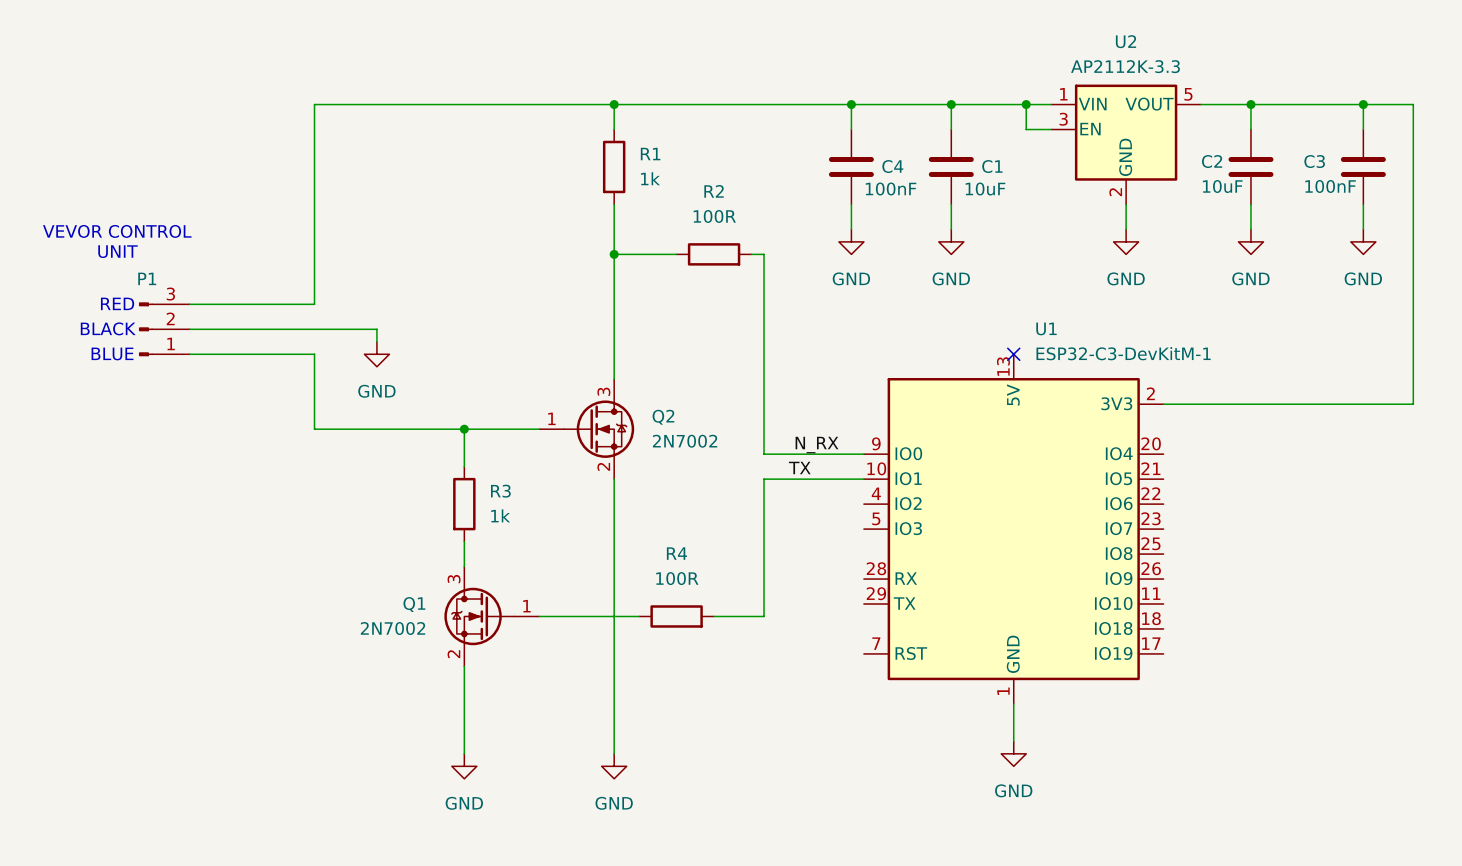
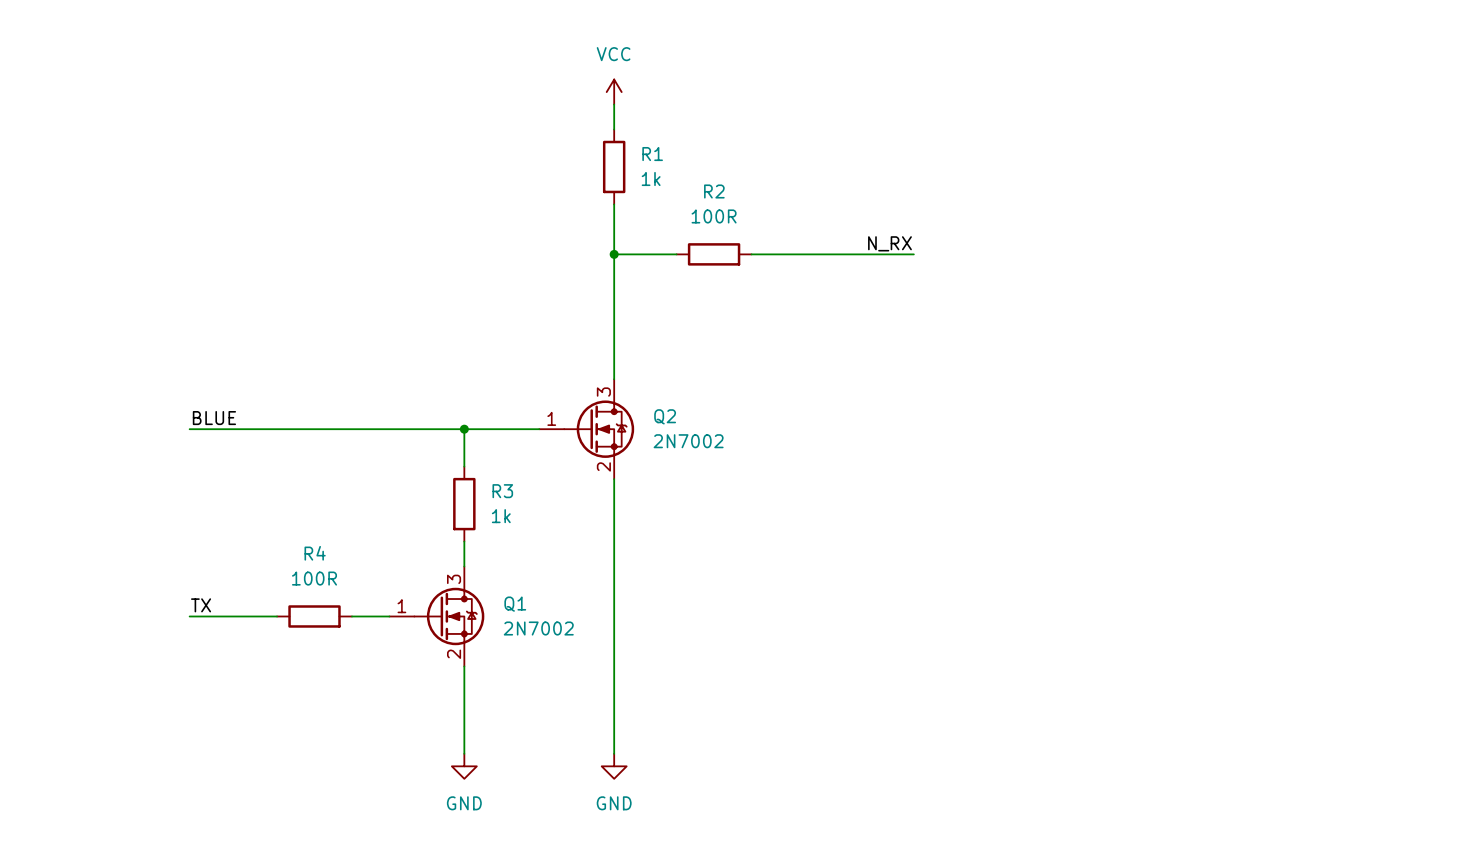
power symbol: none -> VCC (614, 92)
junction: (614, 104) -> none
wire: (851, 104) (851, 129) -> none
junction: (851, 104) -> none
wire: (951, 104) (951, 129) -> none
junction: (951, 104) -> none
wire: (1026, 104) (1026, 129) (1051, 129) -> none
junction: (1026, 104) -> none
wire: (1051, 104) (314, 104) (314, 304) (189, 304) -> none
wire: (1201, 104) (1413, 104) (1413, 404) (1163, 404) -> none
wire: (1250, 104) (1250, 129) -> none
junction: (1250, 104) -> none
wire: (1363, 104) (1363, 129) -> none
junction: (1363, 104) -> none
U2: AP2112K-3.3 (1126, 144) -> none
C4: 100nF (851, 166) -> none
C1: 10uF (951, 166) -> none
C2: 10uF (1250, 166) -> none
C3: 100nF (1363, 166) -> none
wire: (851, 204) (851, 229) -> none
wire: (951, 204) (951, 229) -> none
wire: (1126, 204) (1126, 229) -> none
wire: (1250, 204) (1250, 229) -> none
wire: (1363, 204) (1363, 229) -> none
text: VEVOR CONTROL (117, 231) -> none
power symbol: GND (851, 241) -> none
power symbol: GND (951, 241) -> none
power symbol: GND (1126, 241) -> none
power symbol: GND (1250, 241) -> none
power symbol: GND (1363, 241) -> none
text: UNIT (117, 251) -> none
wire: (764, 254) (764, 454) (863, 454) -> (764, 254) (913, 254)
text: RED (117, 303) -> none
text: BLACK (108, 328) -> none
P1: (164, 329) -> none
wire: (189, 329) (376, 329) (376, 341) -> none
text: BLUE (112, 353) -> none
wire: (189, 354) (314, 354) (314, 429) -> (189, 429) (314, 429)
power symbol: GND (376, 354) -> none
no-connect mark: (1013, 354) -> none
label: none -> BLUE (214, 418)
label position: N_RX (817, 445) -> N_RX (889, 243)
label: TX (799, 468) -> none
wire: (863, 479) (764, 479) (764, 616) (714, 616) -> none
U1: ESP32-C3-DevKitM-1 (1013, 529) -> none
label: none -> TX (201, 605)
wire: none -> (189, 616) (277, 616)
wire: none -> (351, 616) (389, 616)
Q1 flip: as is (479, 616) -> left-right (449, 616)
wire: (539, 616) (639, 616) -> none
R4 position: (676, 616) -> (314, 616)
wire: (1013, 703) (1013, 741) -> none
power symbol: GND (1013, 753) -> none

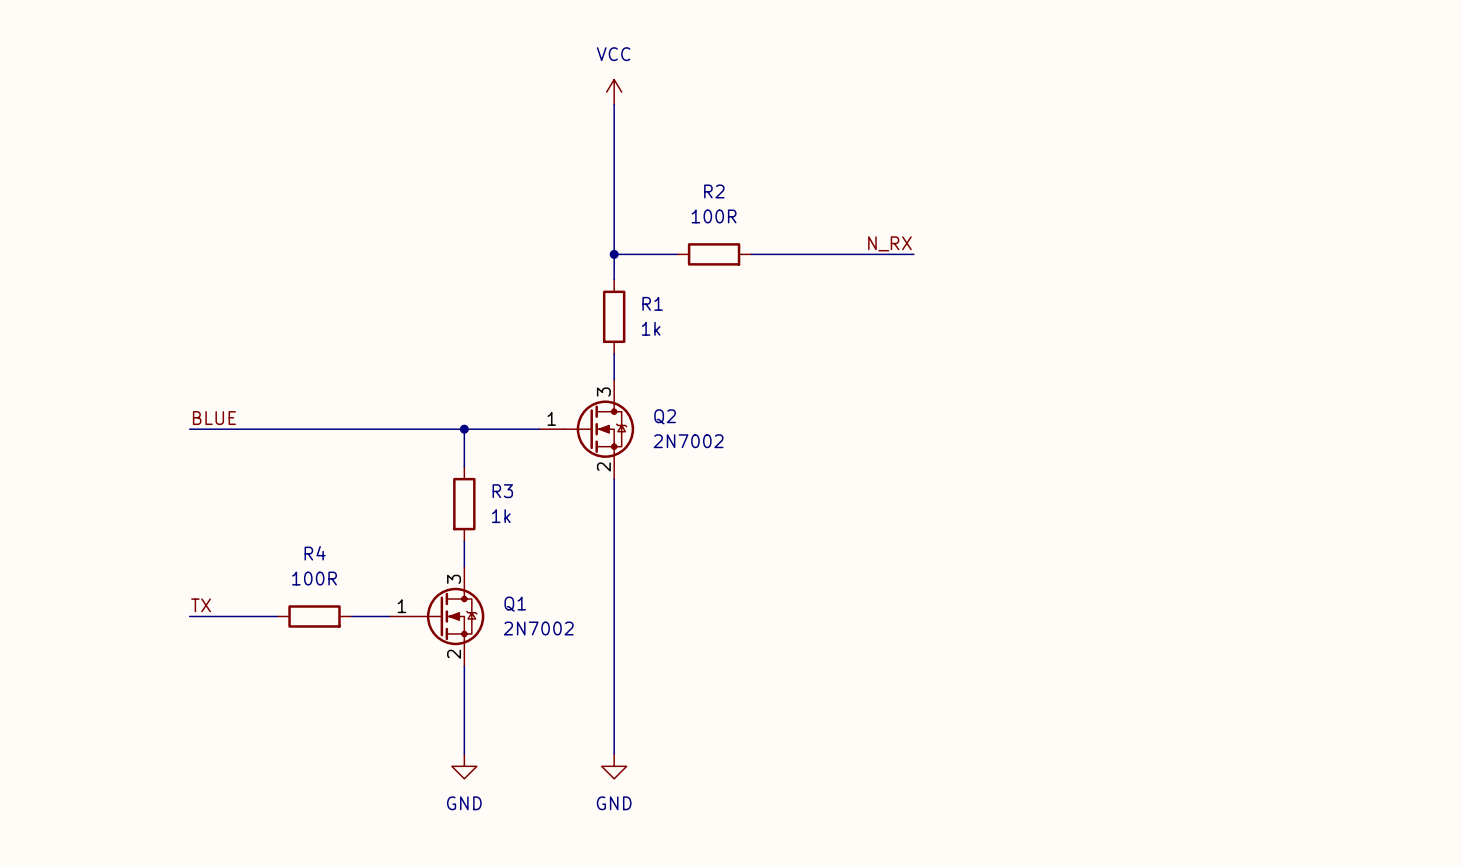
R1 position: (614, 166) -> (614, 316)
wire: (614, 279) (614, 354) -> (614, 129) (614, 204)

